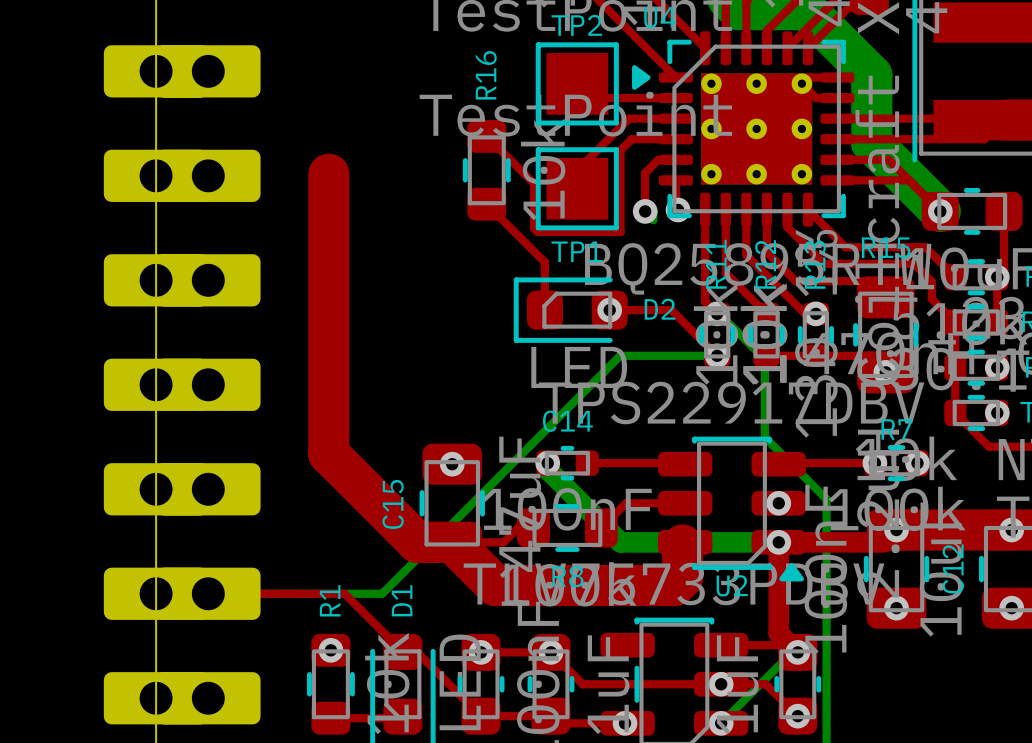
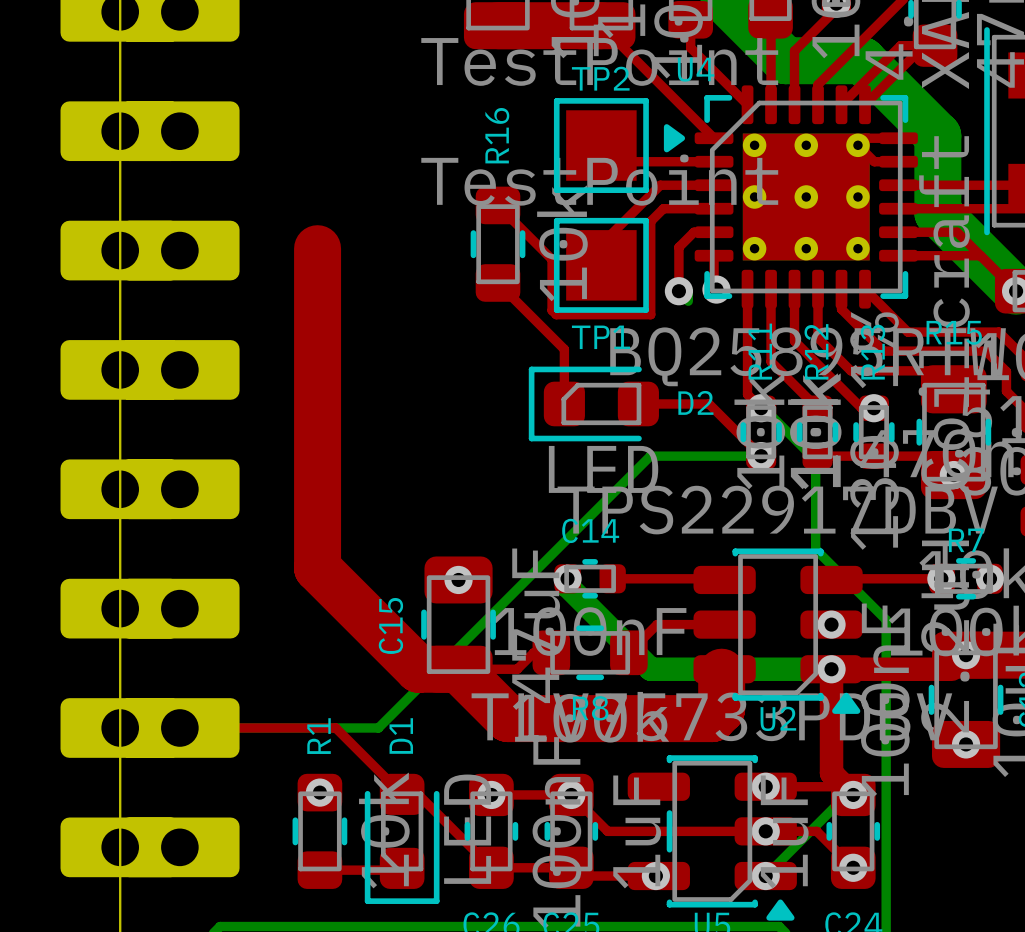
via: (609, 310) -> none
via: none -> (765, 786)

